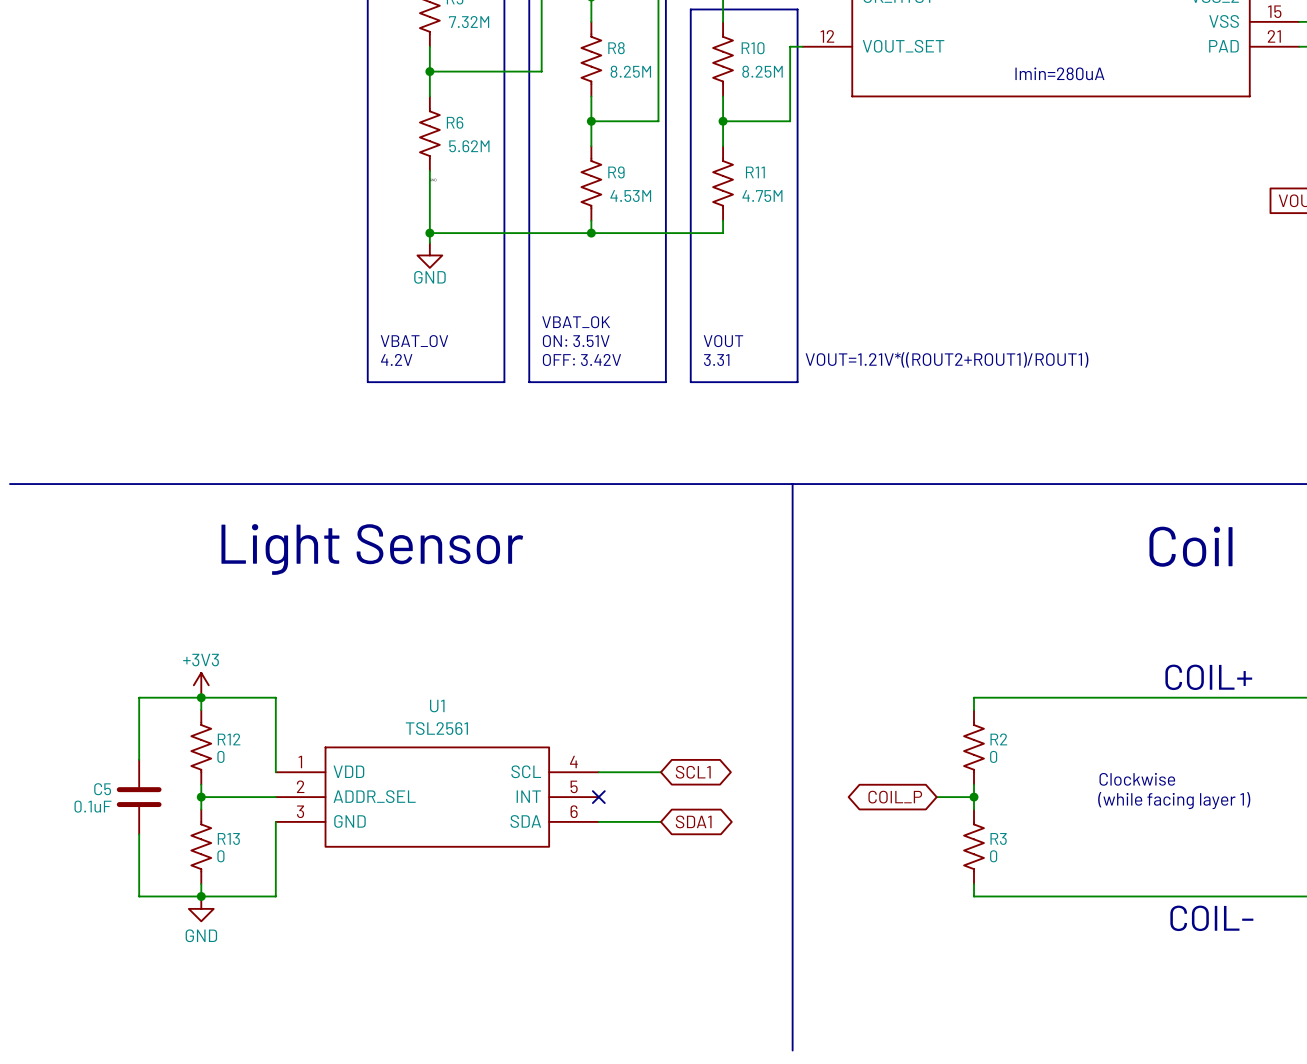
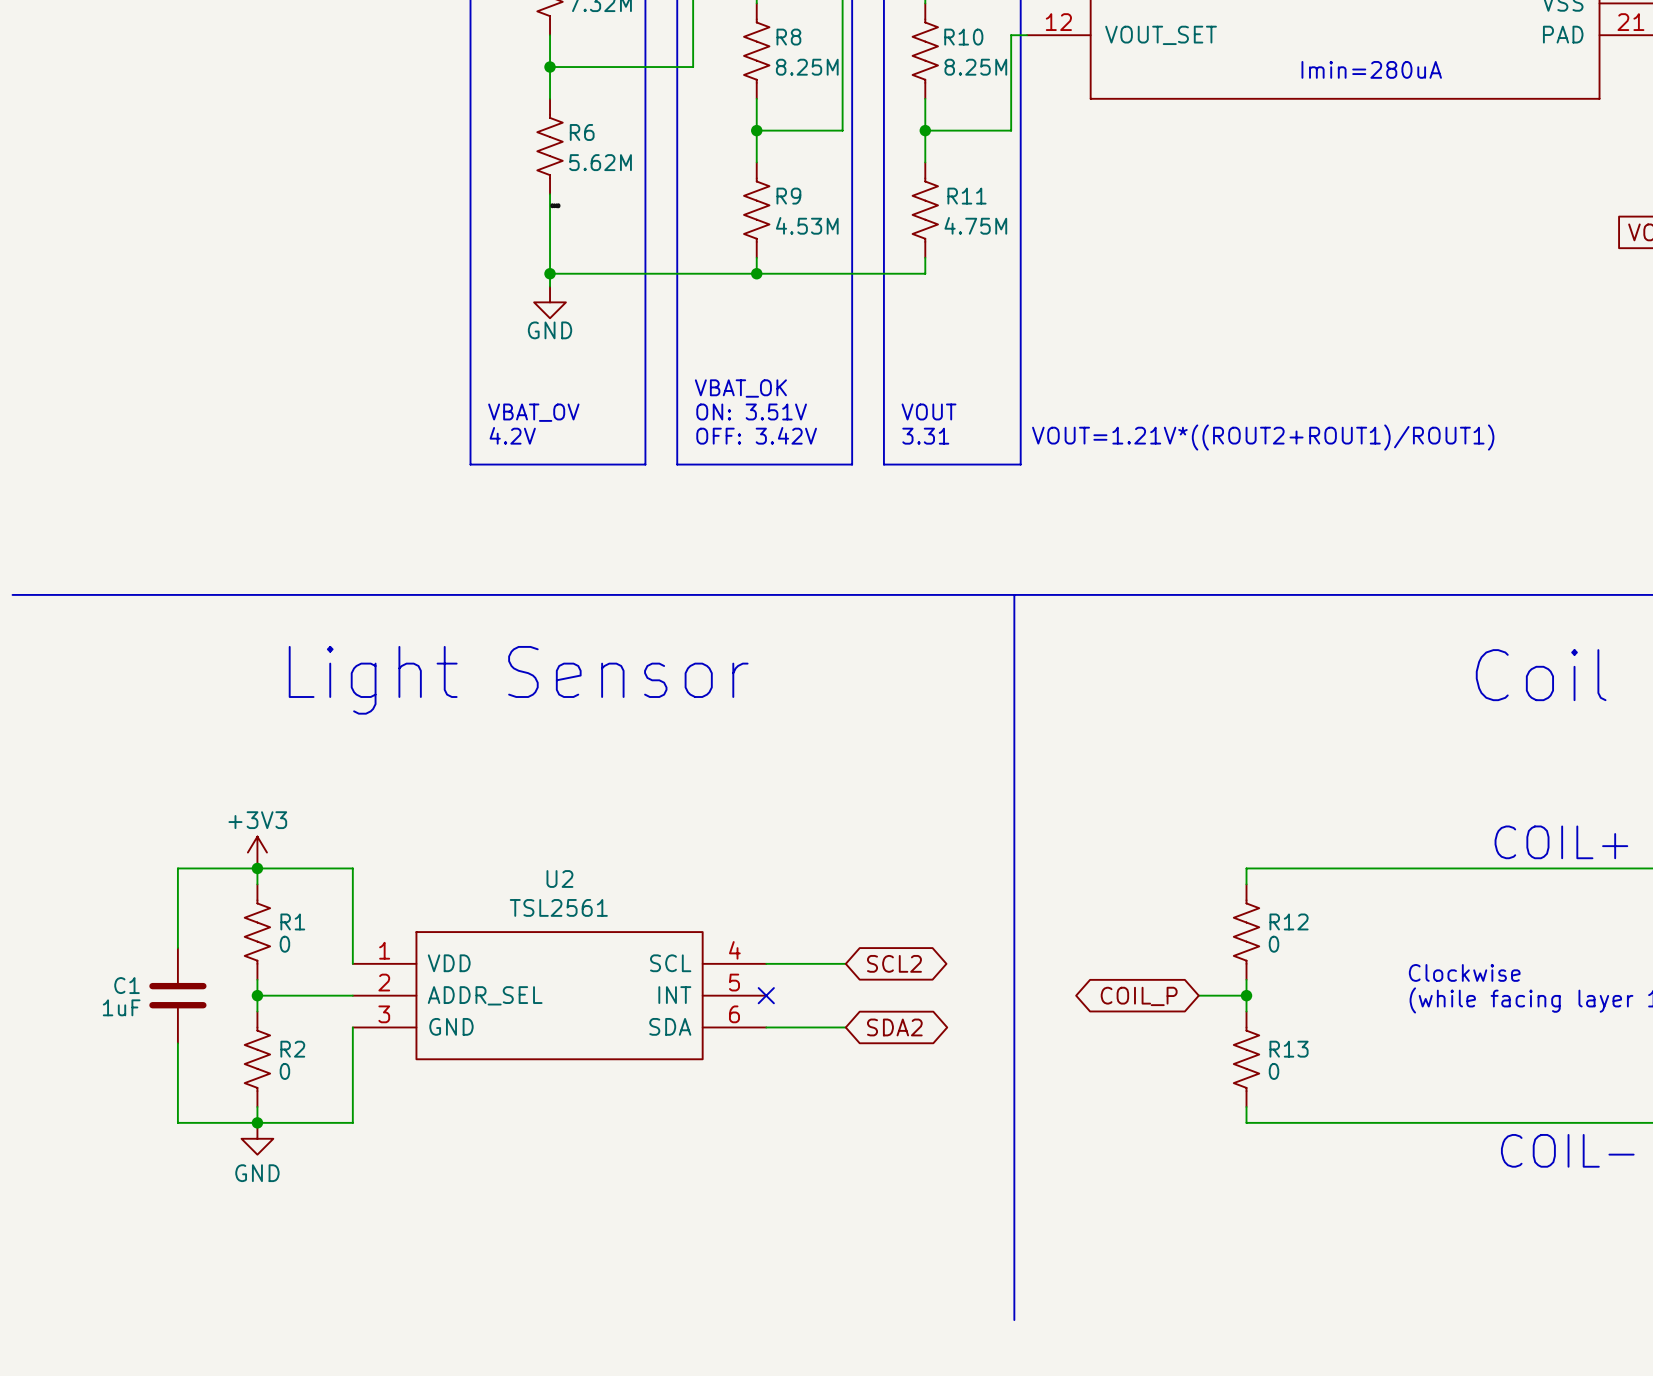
U1 name: U1 (437, 706) -> U2 (559, 878)
R12 name: R12 (229, 739) -> R1 (292, 921)
R2 name: R2 (998, 739) -> R12 (1289, 921)
global label: SCL1 (693, 772) -> SCL2 (894, 963)
C5 name: C5 (102, 789) -> C1 (127, 985)
C5 value: 0.1uF (92, 806) -> 1uF (121, 1007)
global label: SDA1 (693, 821) -> SDA2 (894, 1027)
R13 name: R13 (228, 838) -> R2 (292, 1049)
R3 name: R3 (998, 838) -> R13 (1289, 1049)

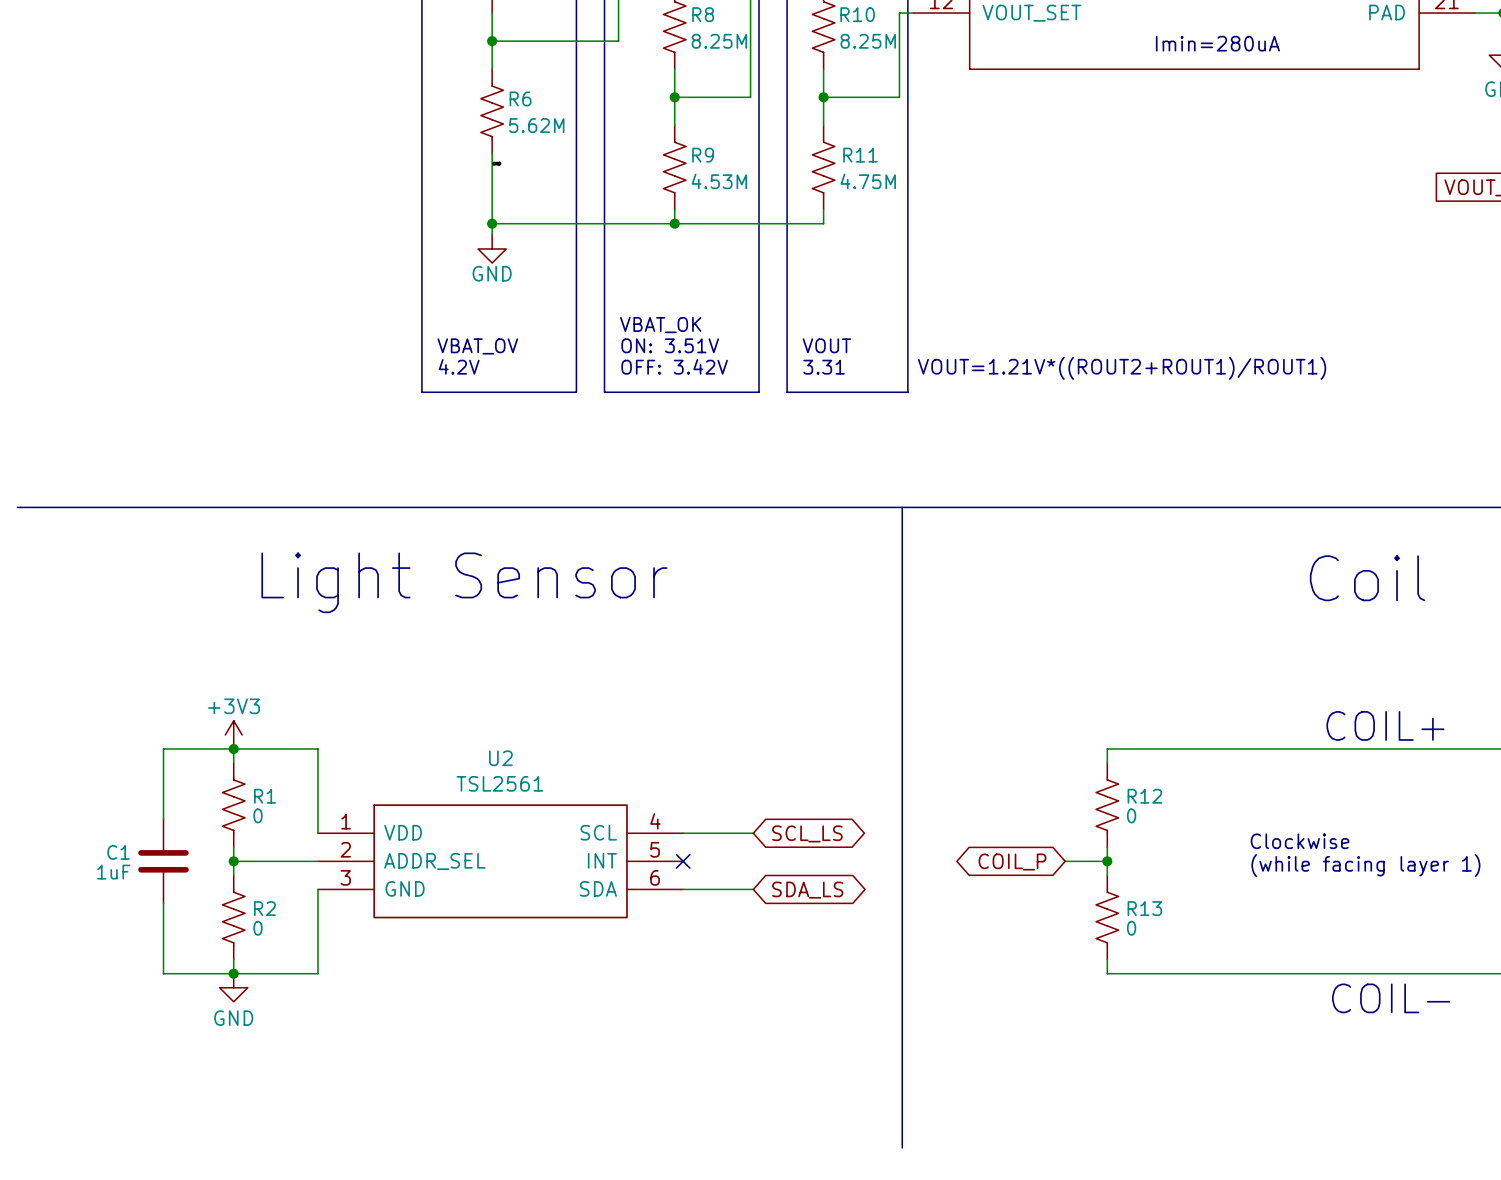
global label: SCL2 (894, 963) -> SCL_LS (807, 833)
global label: SDA2 (894, 1027) -> SDA_LS (807, 890)

